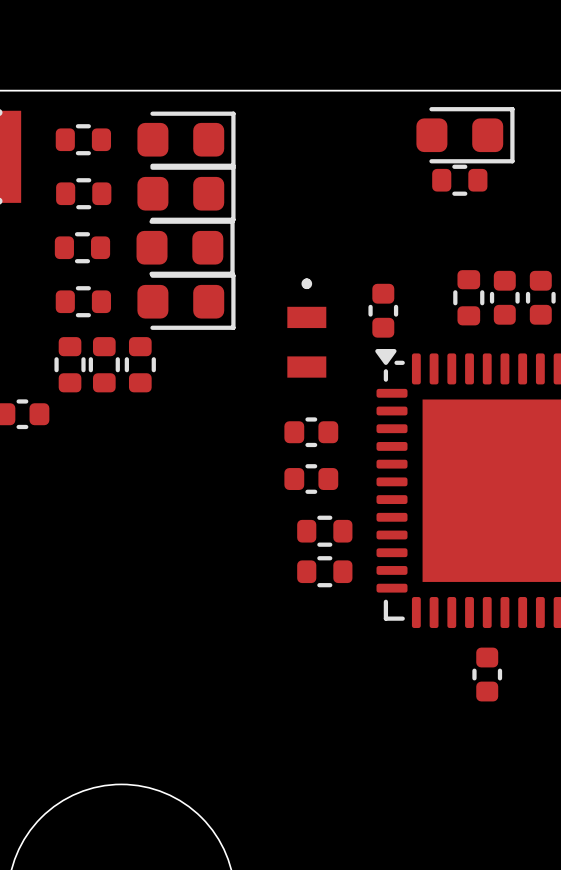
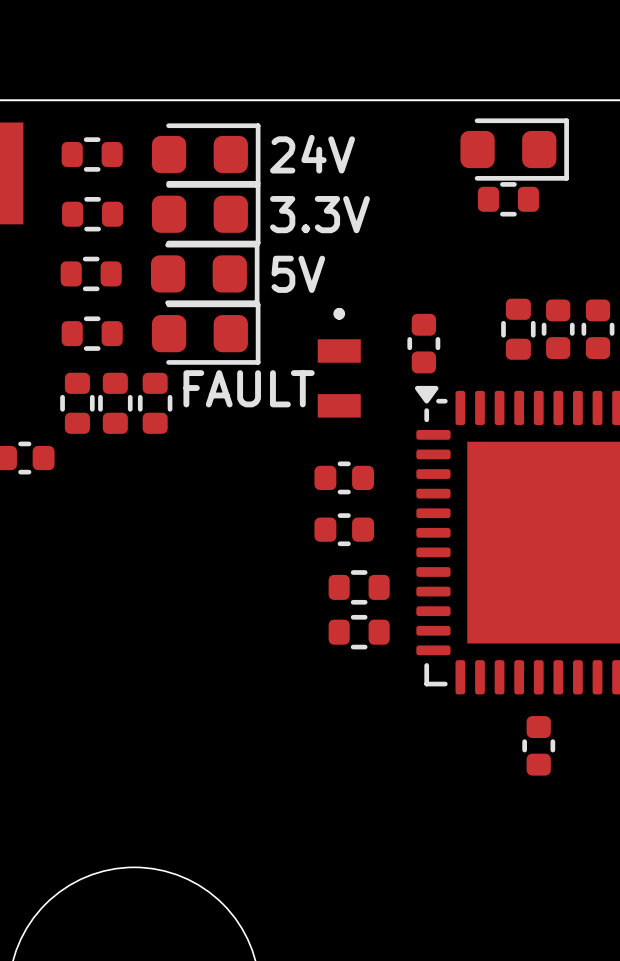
text: none -> 24V (312, 154)
text: none -> 3.3V (319, 214)
text: none -> 5V (298, 274)
text: none -> FAULT (249, 388)

